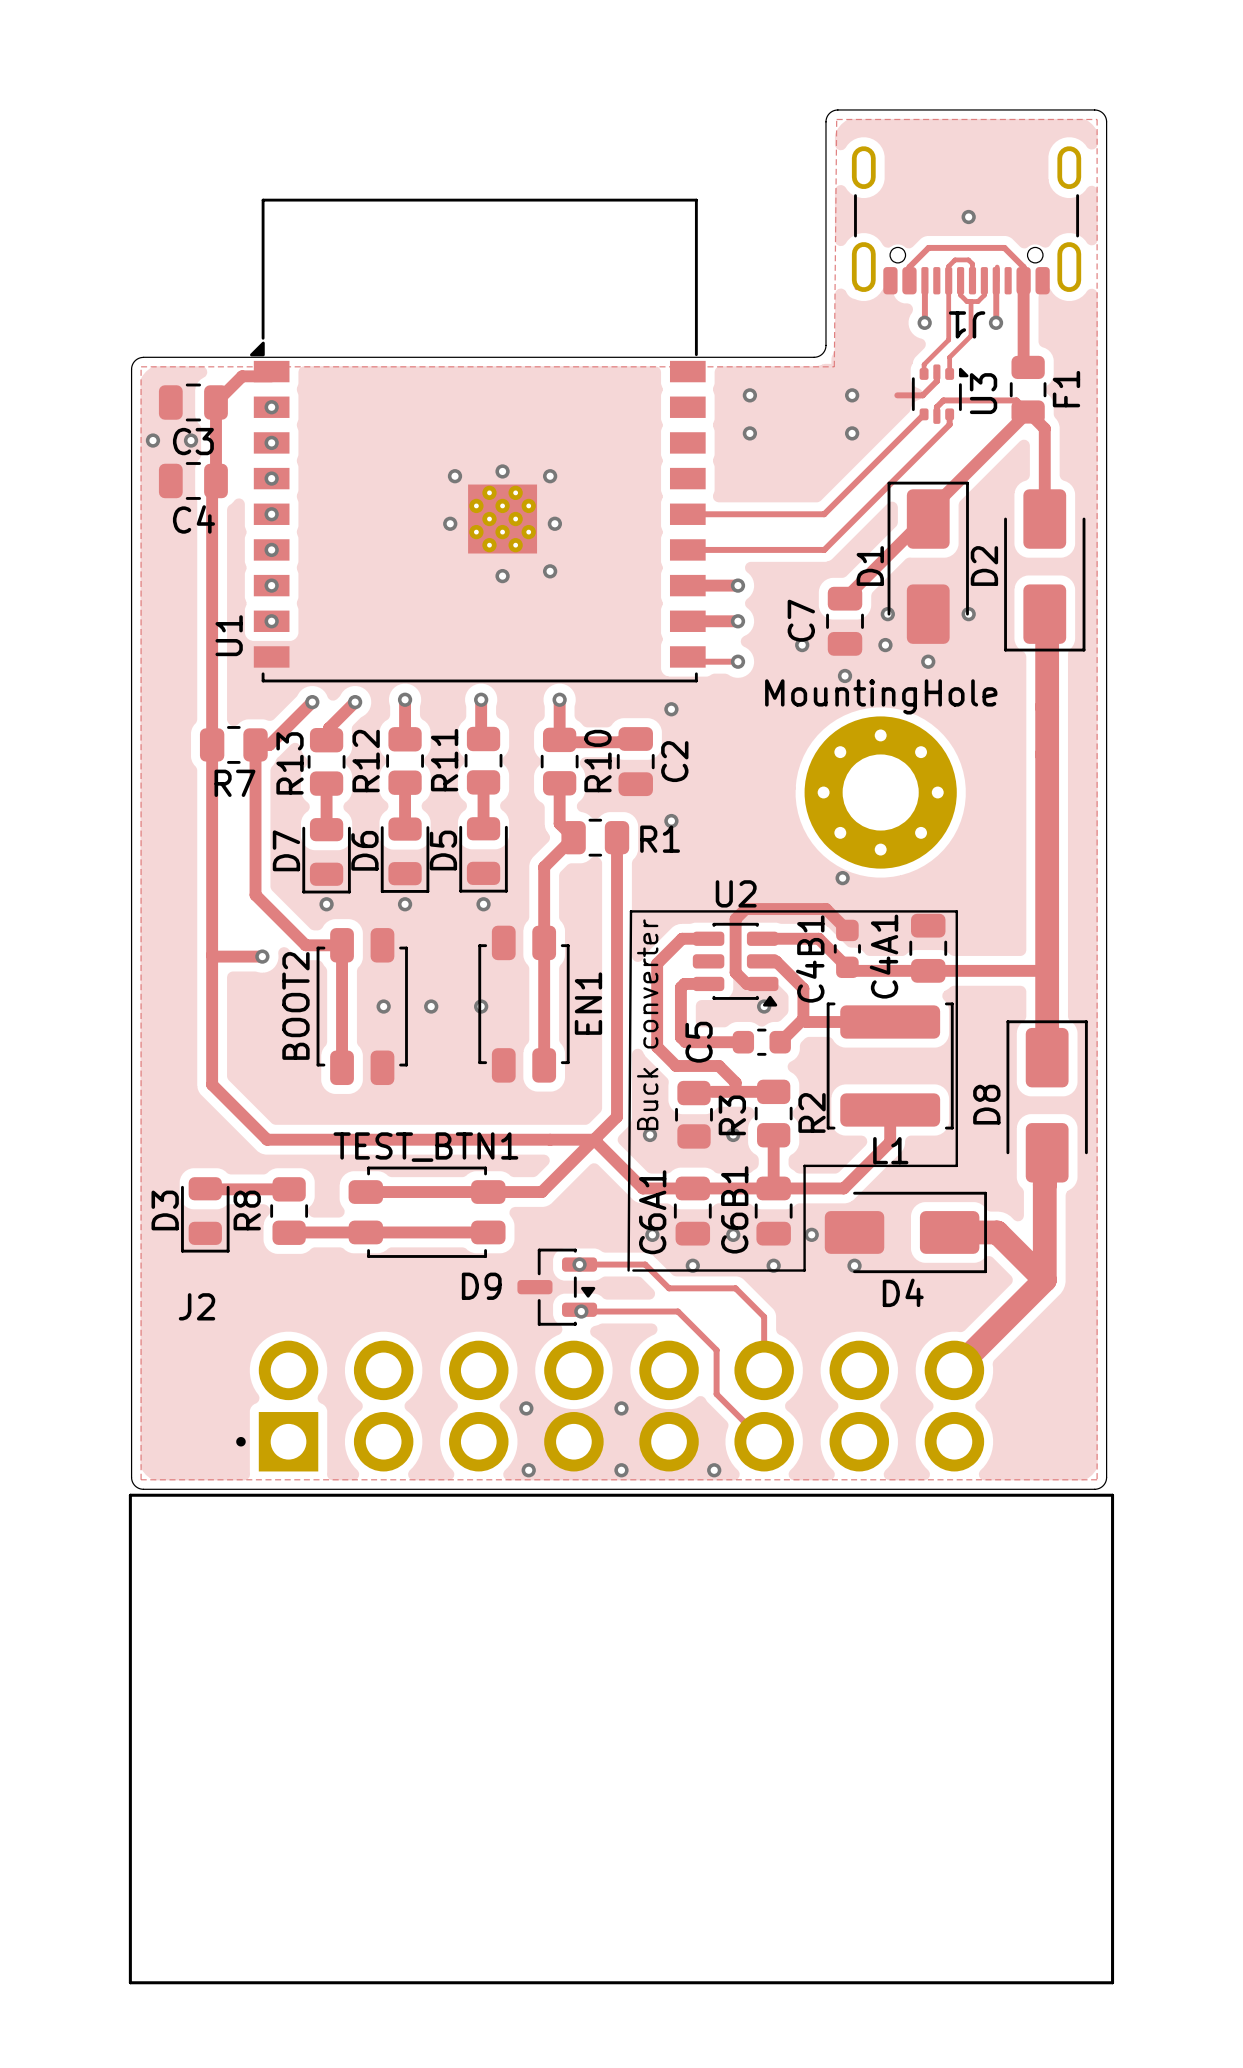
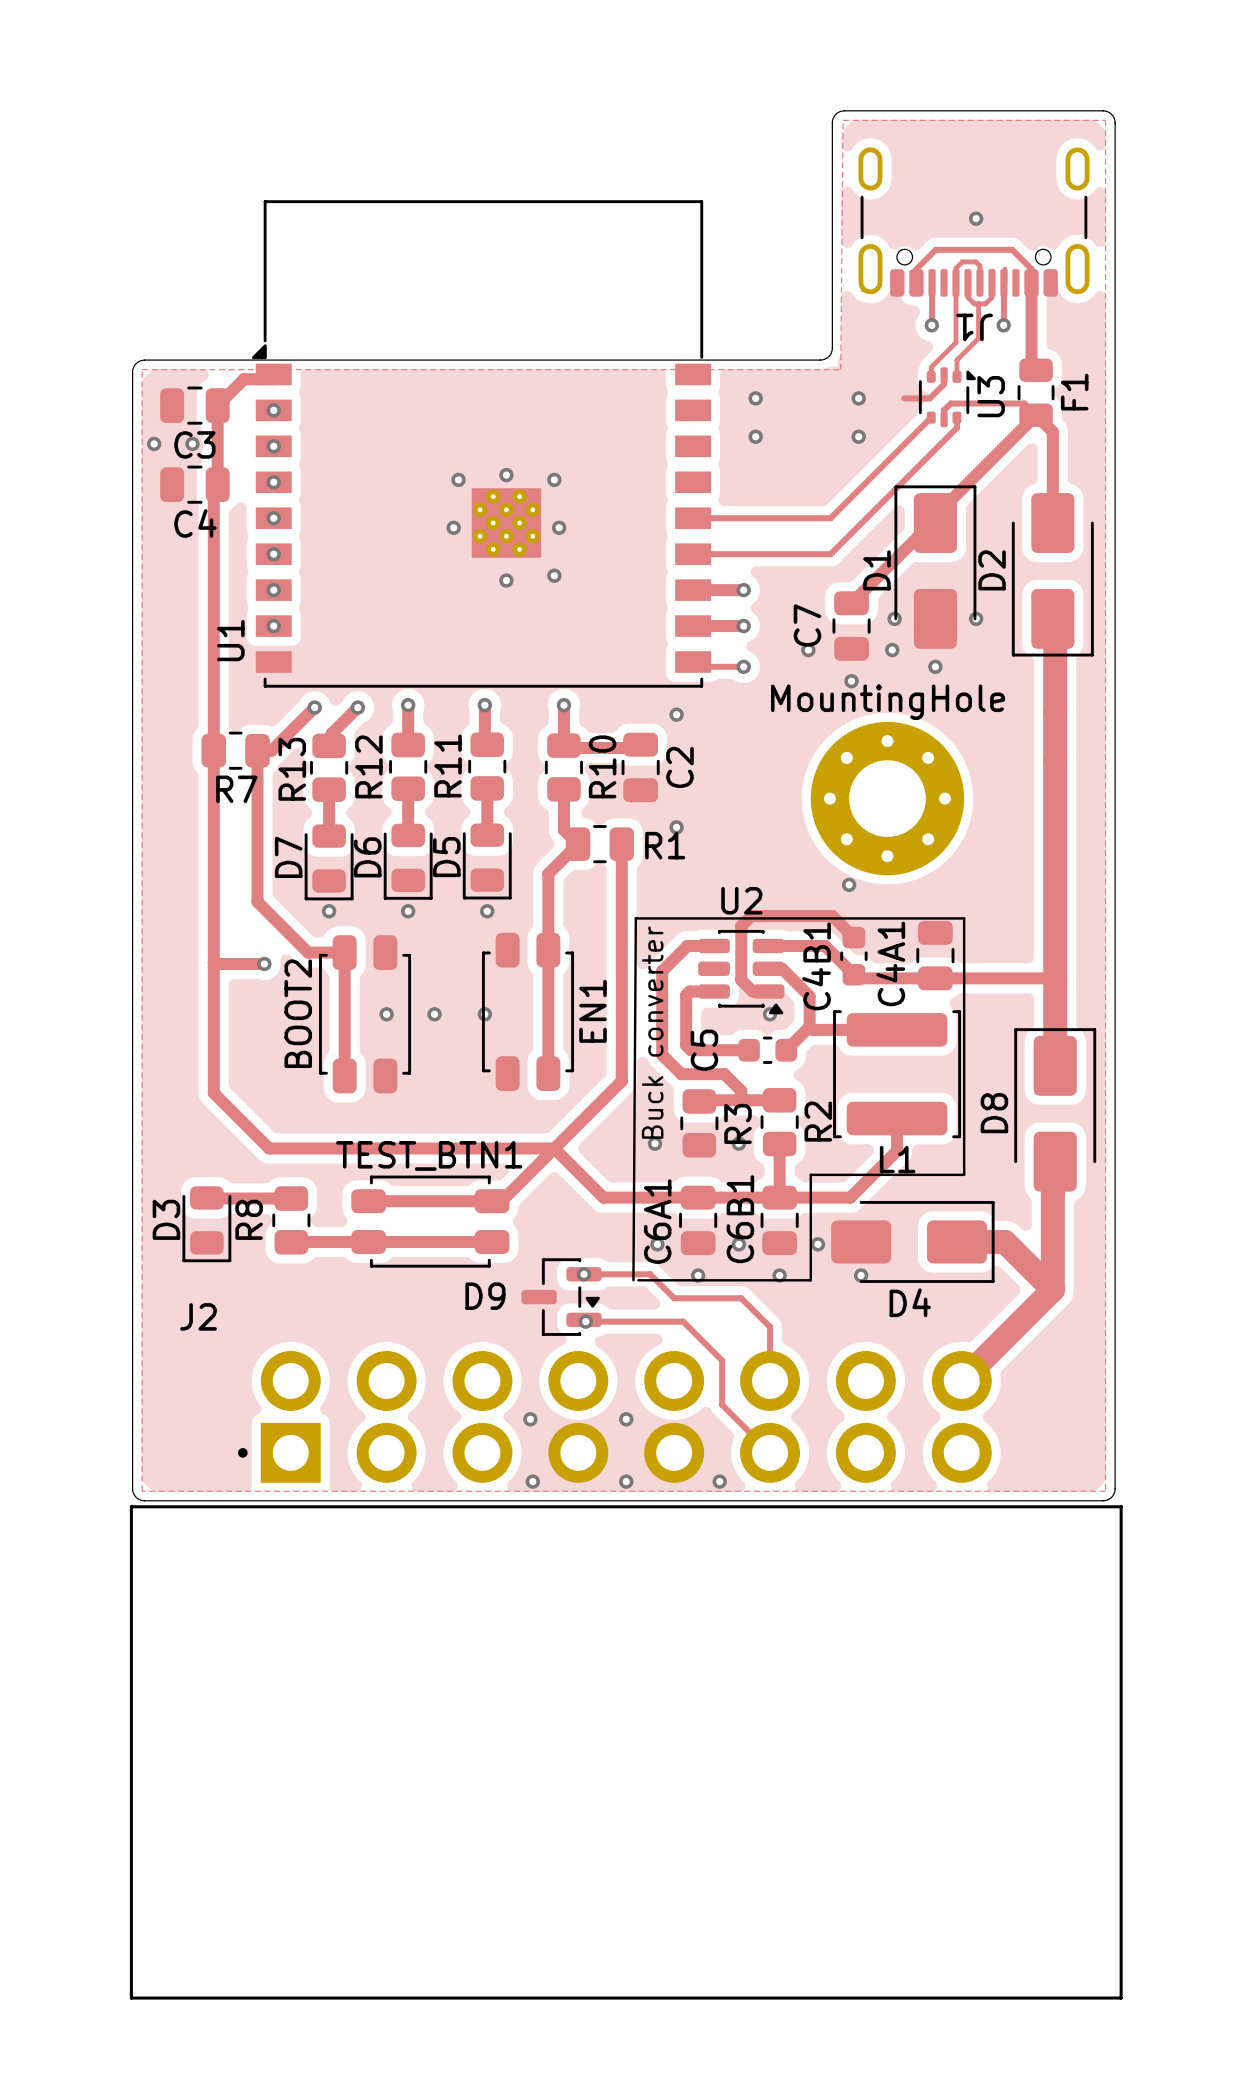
track: (617, 1072) (617, 1116) (541, 1192) (497, 1192) -> (621, 1081) (501, 1201)
track: (550, 1139) (594, 1139) (642, 1188) -> (554, 1148) (603, 1197) (647, 1197)

